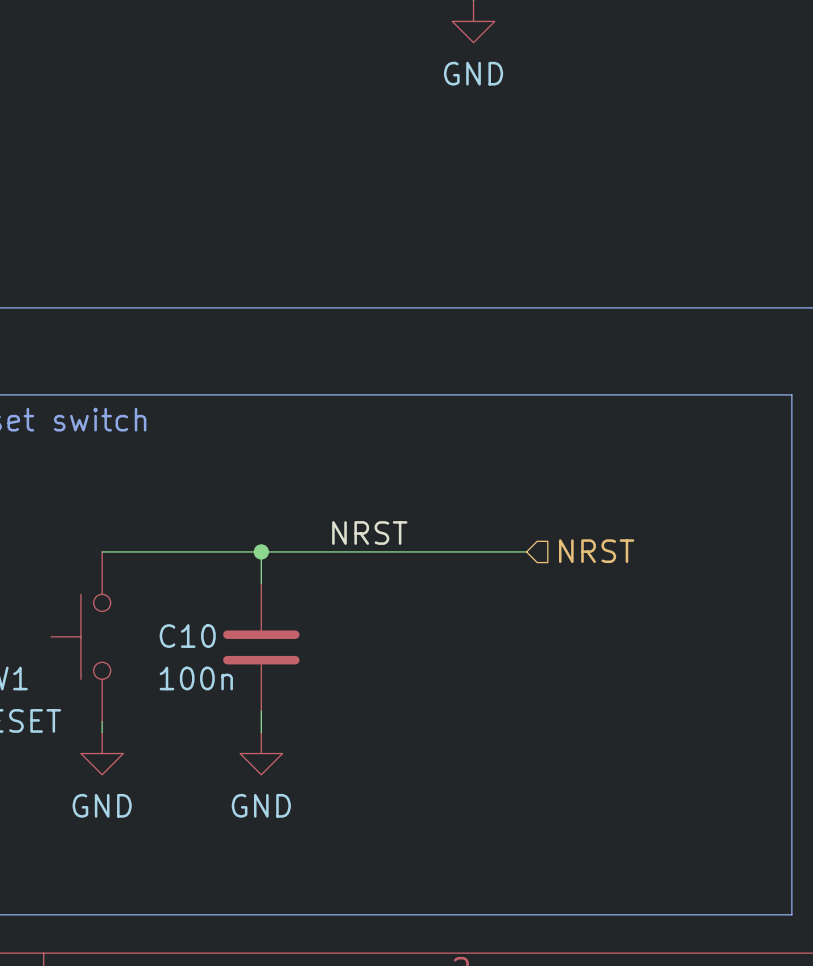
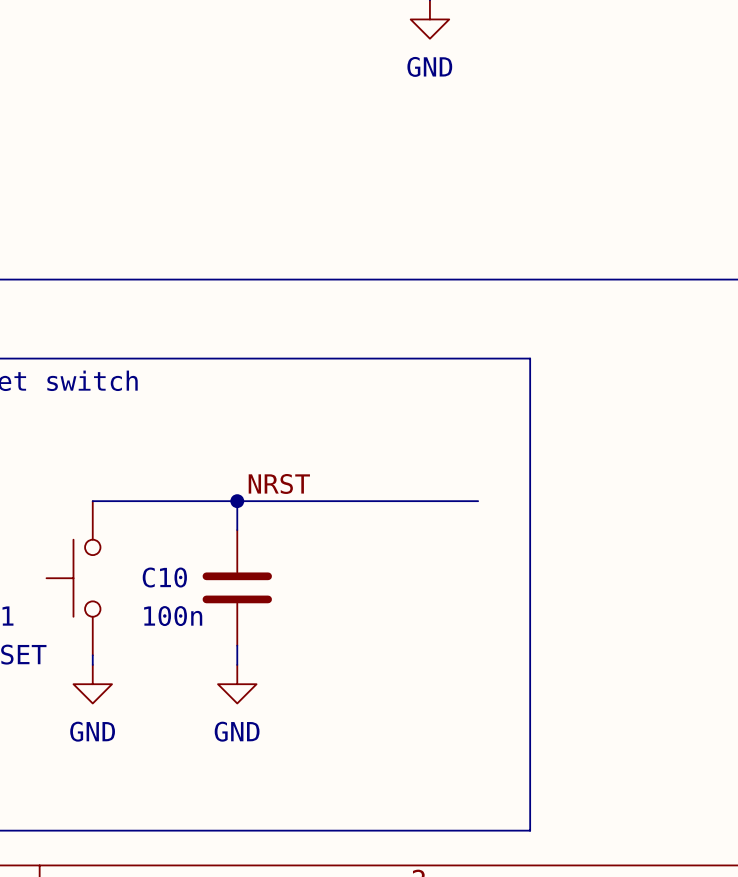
line: (583, 394) (791, 394) (791, 914) (583, 914) -> (530, 358) (530, 830)
label position: NRST (369, 533) -> NRST (279, 483)
hierarchical label: NRST (596, 551) -> none

